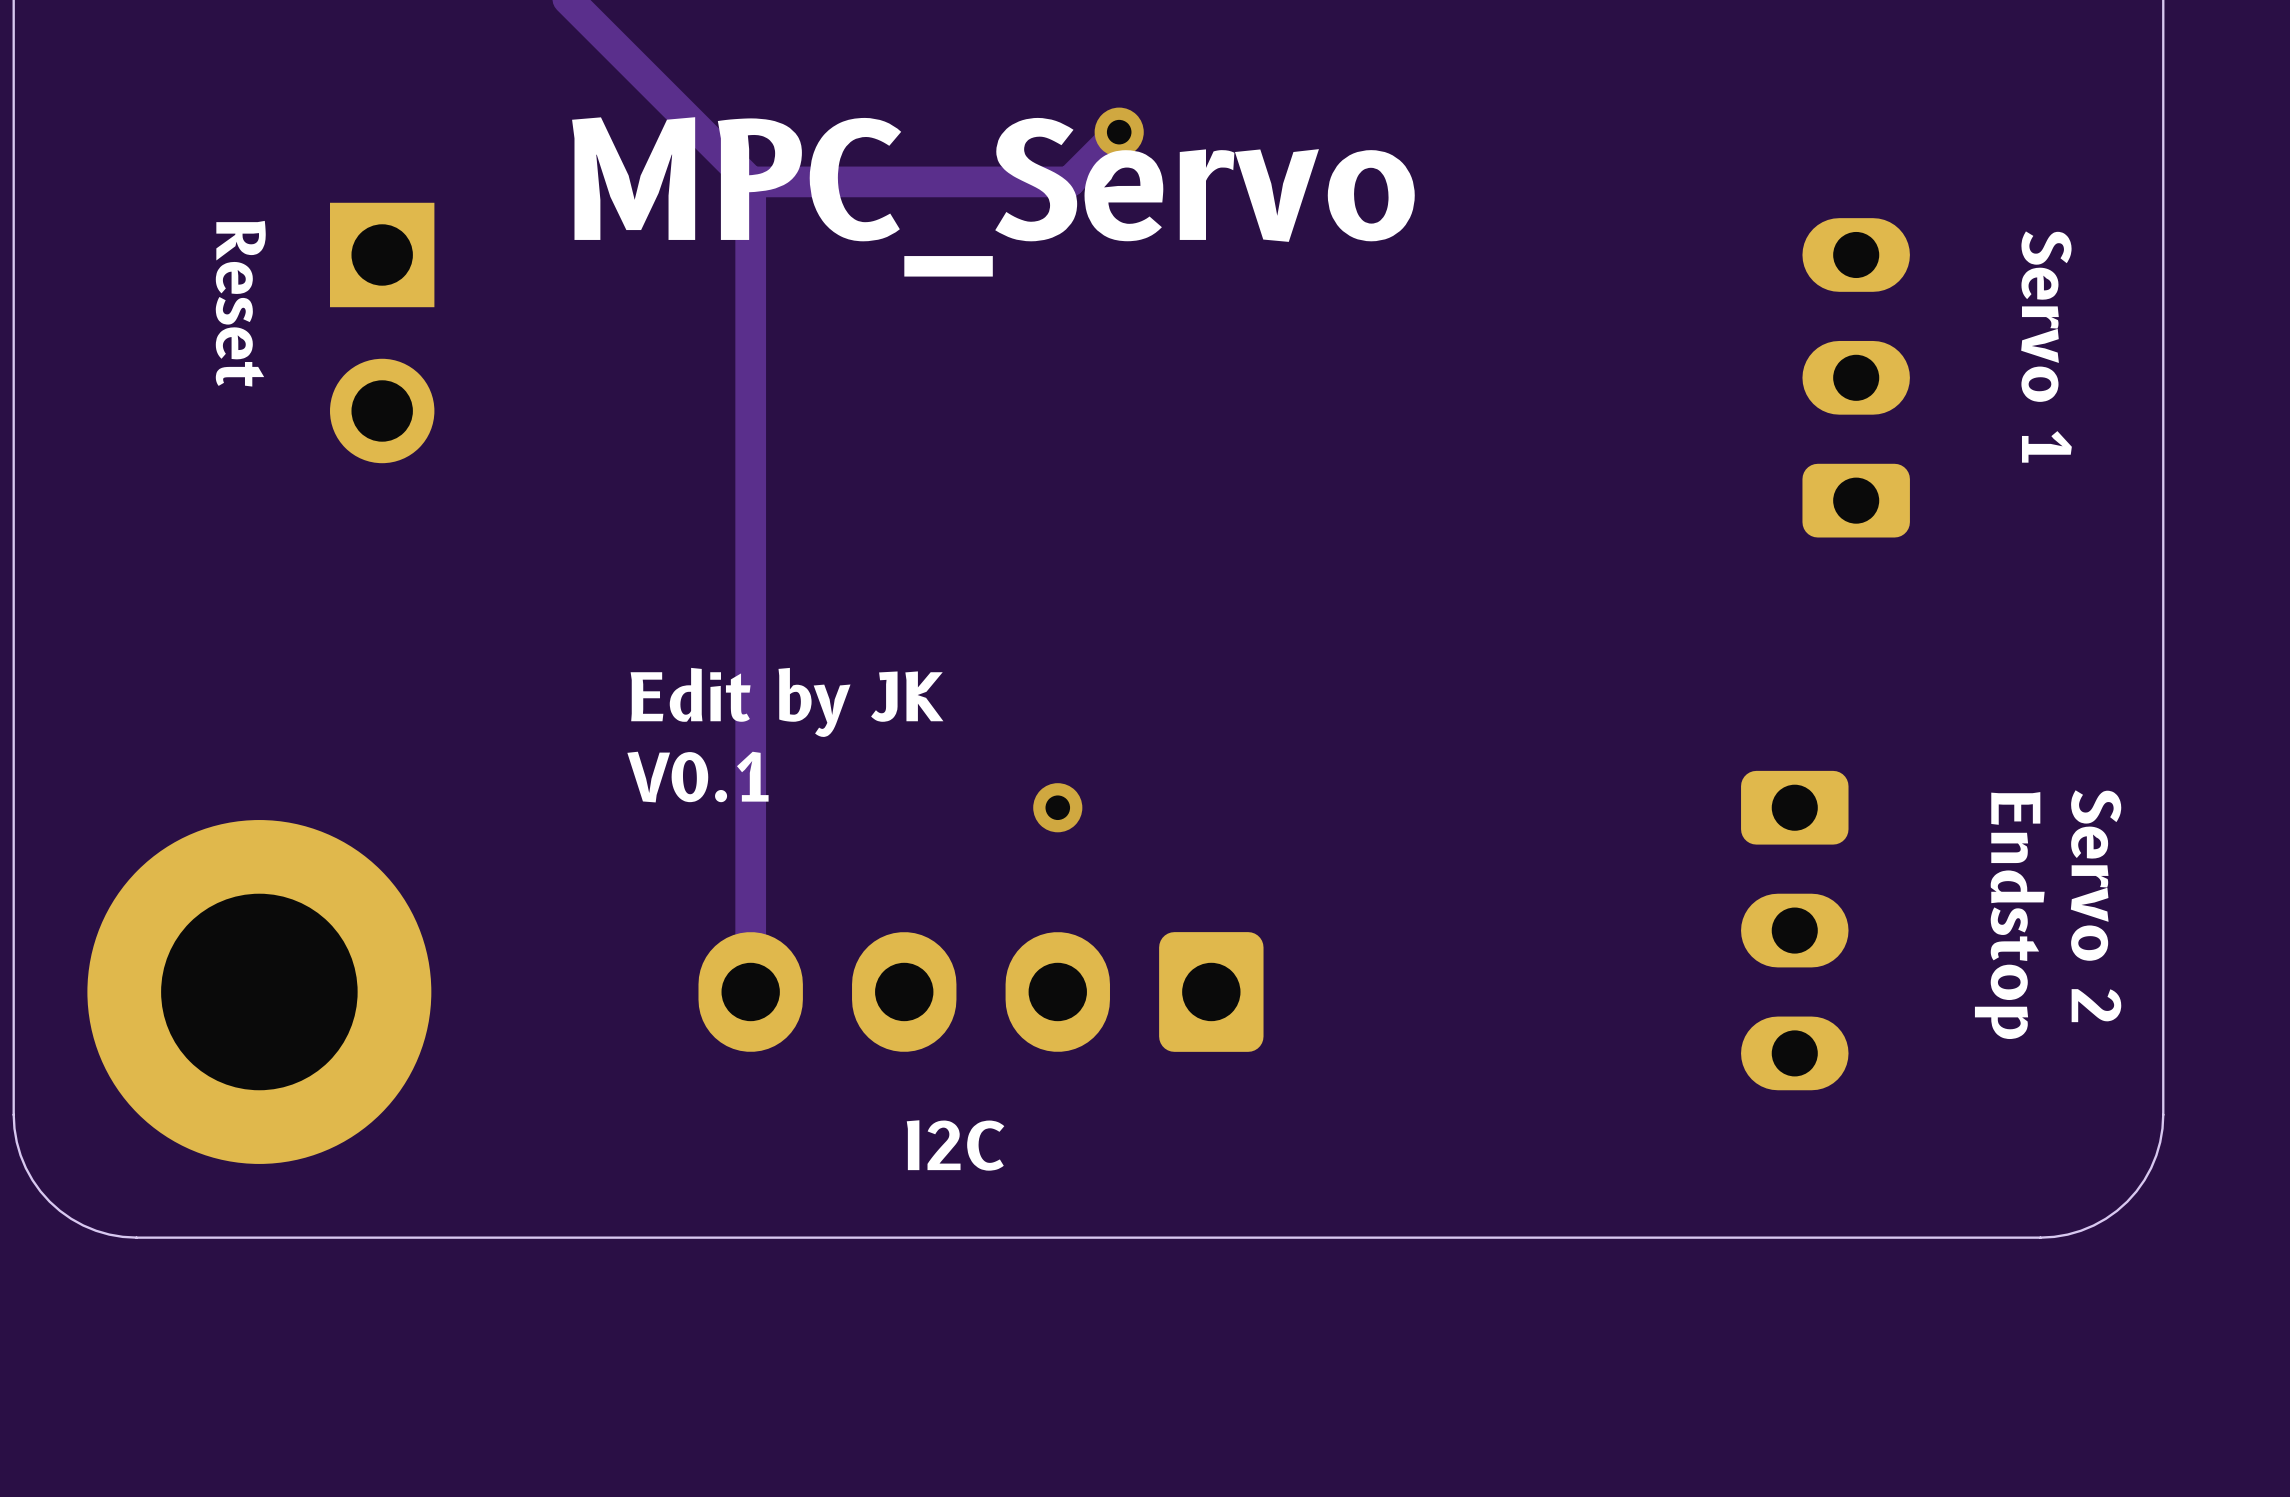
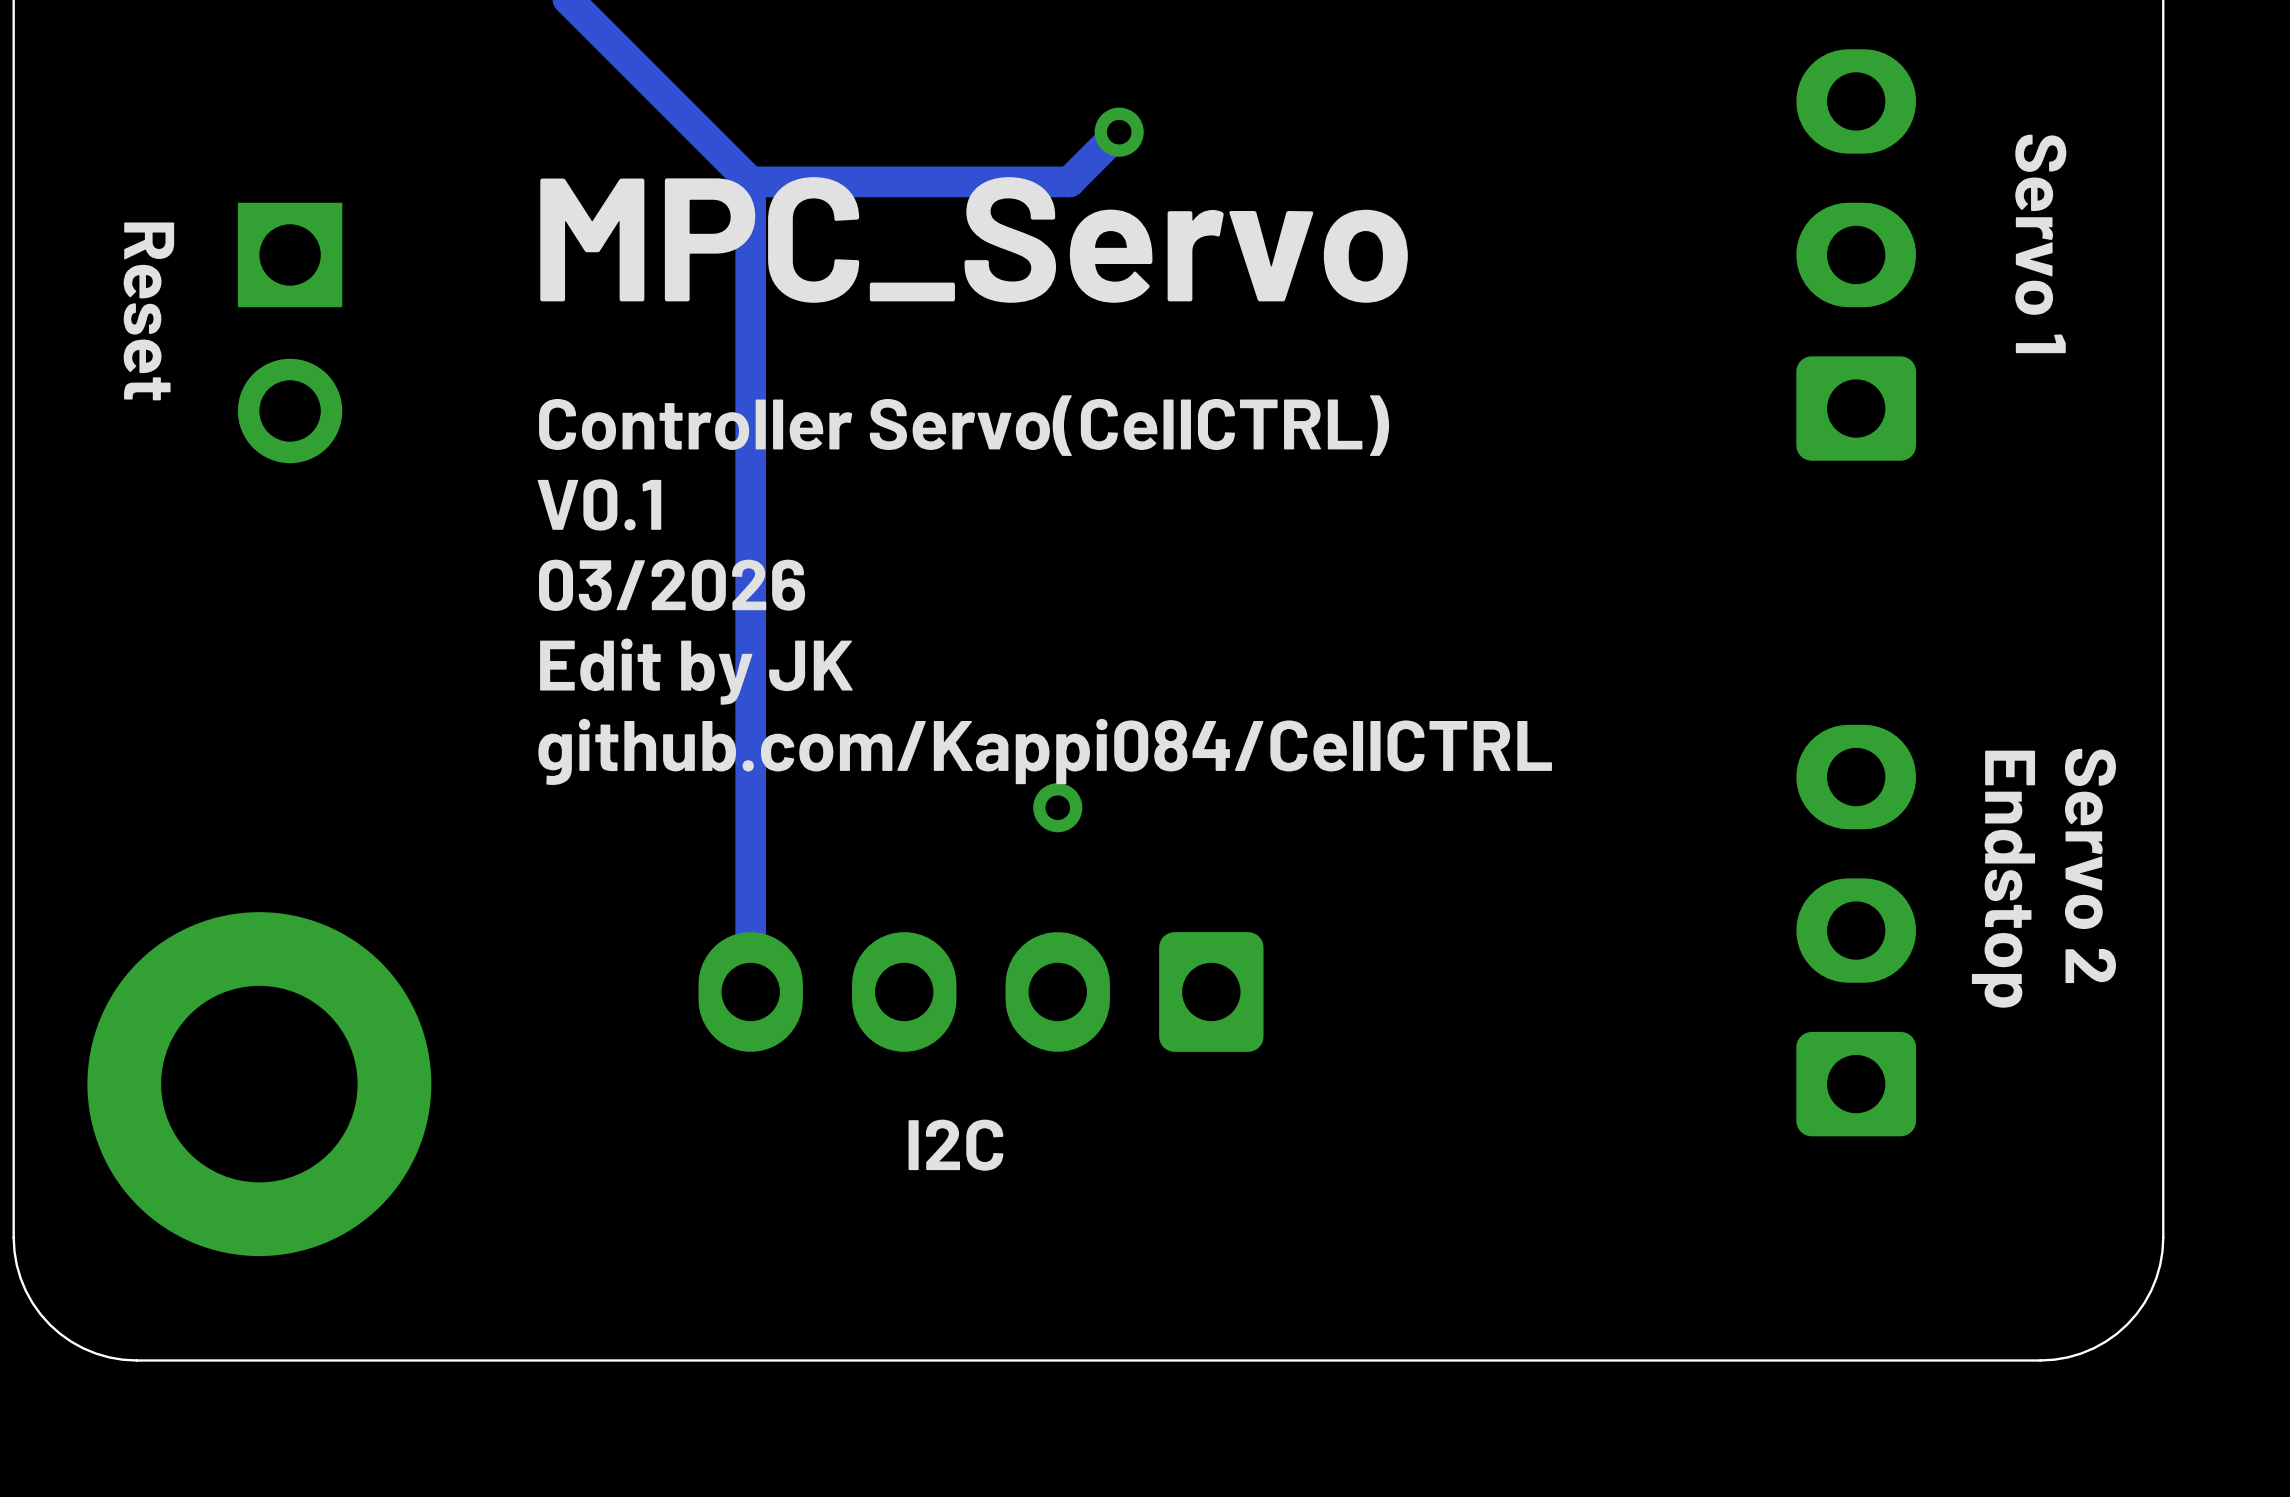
text position: MPC_Servo (993, 196) -> MPC_Servo (974, 239)
part: none -> (1856, 254)
text position: Reset (240, 303) -> Reset (148, 311)
part position: (382, 332) -> (290, 332)
text position: Servo 1 (2046, 347) -> Servo 1 (2040, 243)
part: (1856, 377) -> none
text: none -> Controller Servo(CellCTRL) (964, 425)
text: none -> 03/2026 (672, 585)
text position: Edit by JK (787, 702) -> Edit by JK (696, 671)
text: none -> github.com/Kappi084/CellCTRL (1045, 751)
text position: V0.1 (697, 777) -> V0.1 (599, 504)
text position: Servo 2 (2096, 906) -> Servo 2 (2090, 865)
text position: Endstop (2009, 915) -> Endstop (2003, 879)
part: (1794, 930) -> none
part: none -> (1856, 930)
part position: (259, 991) -> (259, 1084)
board edge: (2163, 1114) (2160, 1142) (2151, 1168) (2136, 1191) (2127, 1201) (2105, 1218) (2081, 1230) (2067, 1234) (2040, 1237) (122, 1236) (95, 1230) (71, 1218) (59, 1210) (40, 1191) (25, 1168) (20, 1155) (14, 1128) (13, 1114) -> (2163, 1114) (2162, 1251) (2156, 1278) (2151, 1290) (2136, 1314) (2117, 1333) (2105, 1341) (2081, 1353) (2067, 1357) (2040, 1360) (122, 1359) (95, 1353) (71, 1341) (49, 1324) (32, 1303) (25, 1290) (20, 1278) (14, 1251) (13, 1114)

